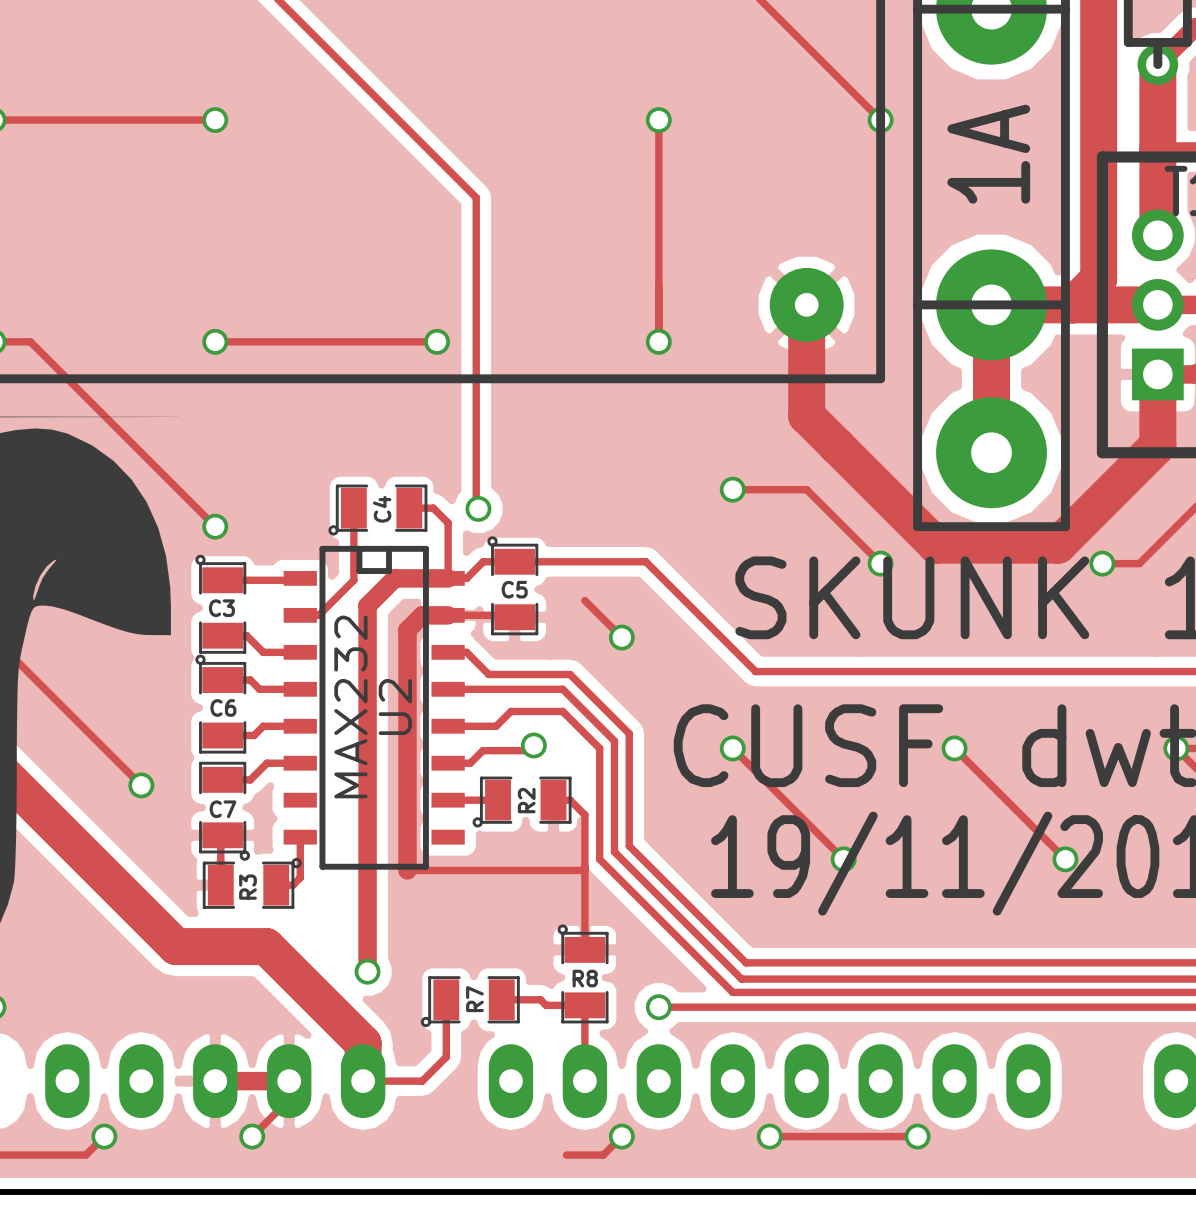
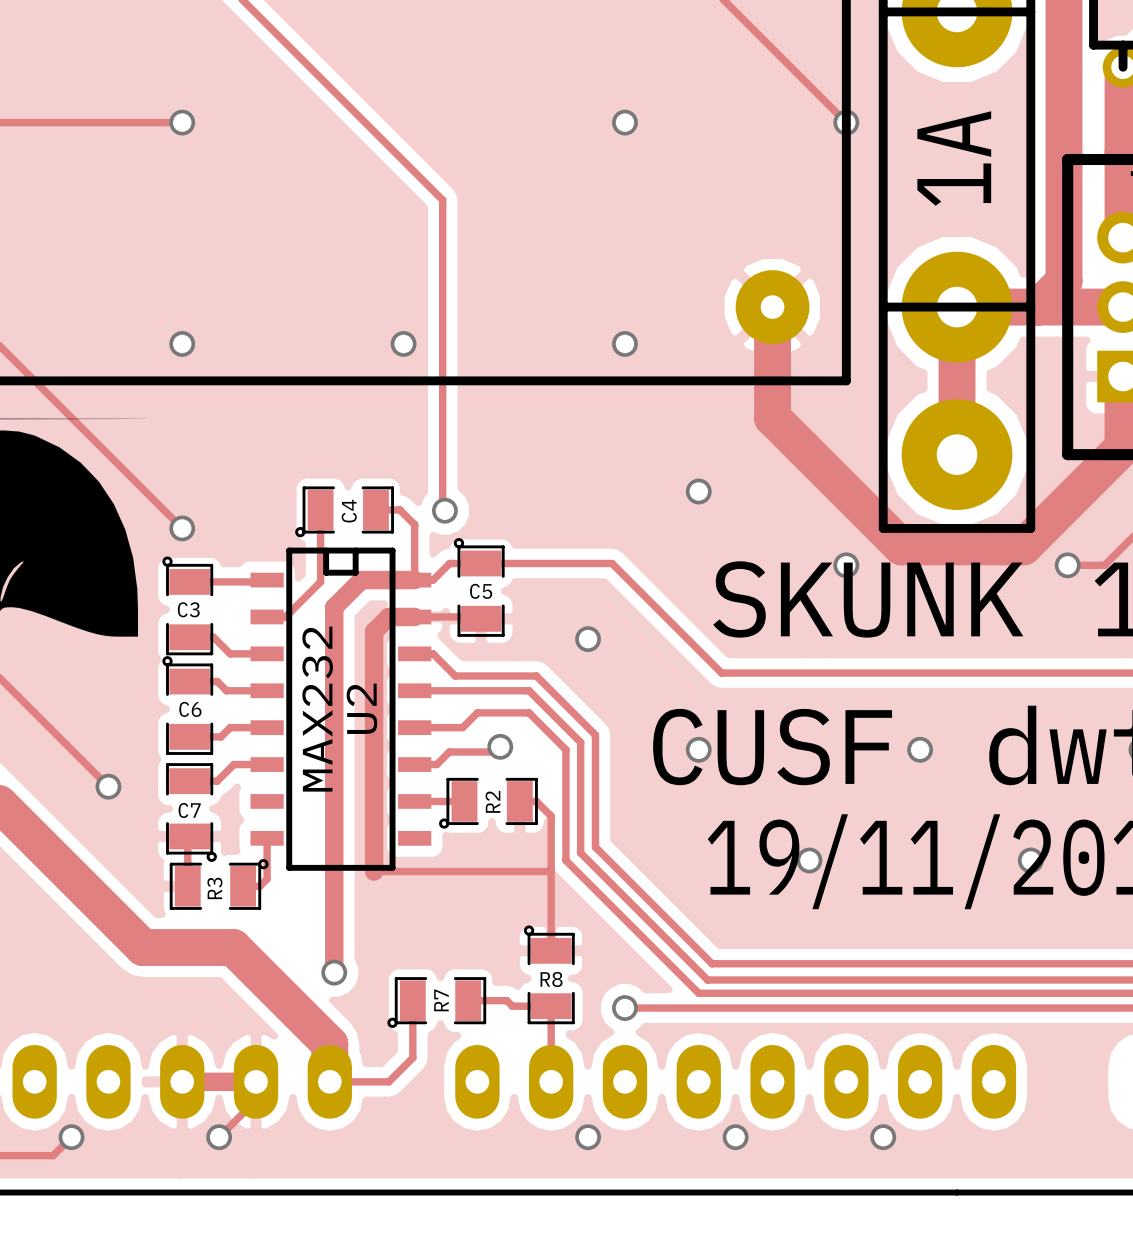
track: (658, 120) (658, 341) -> none
track: (215, 341) (437, 341) -> none
track: (732, 489) (806, 489) (880, 563) -> none
track: (584, 600) (621, 637) -> none
track: (732, 748) (843, 859) -> none
track: (954, 748) (1065, 859) -> none
track: (621, 1136) (603, 1155) (566, 1155) -> none
track: (769, 1136) (917, 1136) -> none

